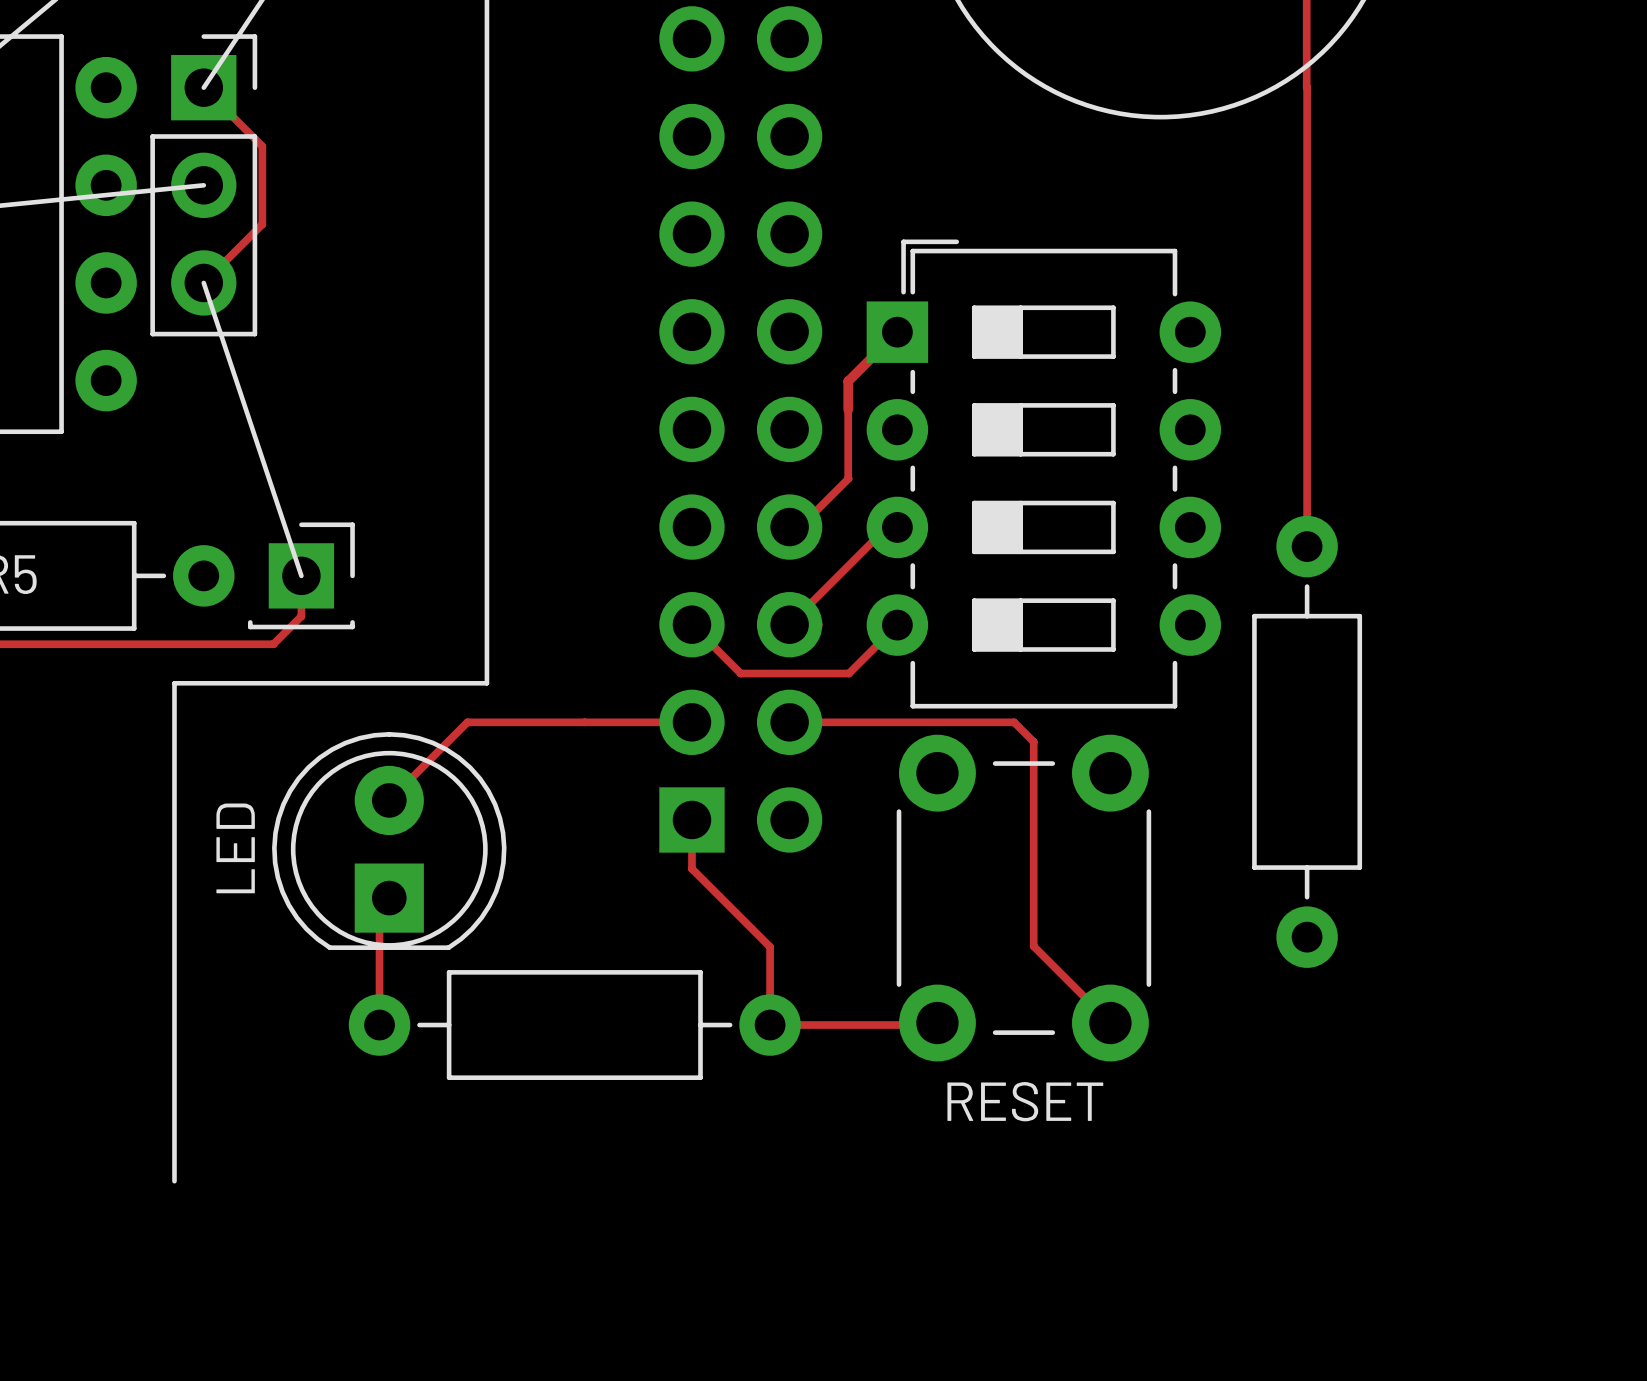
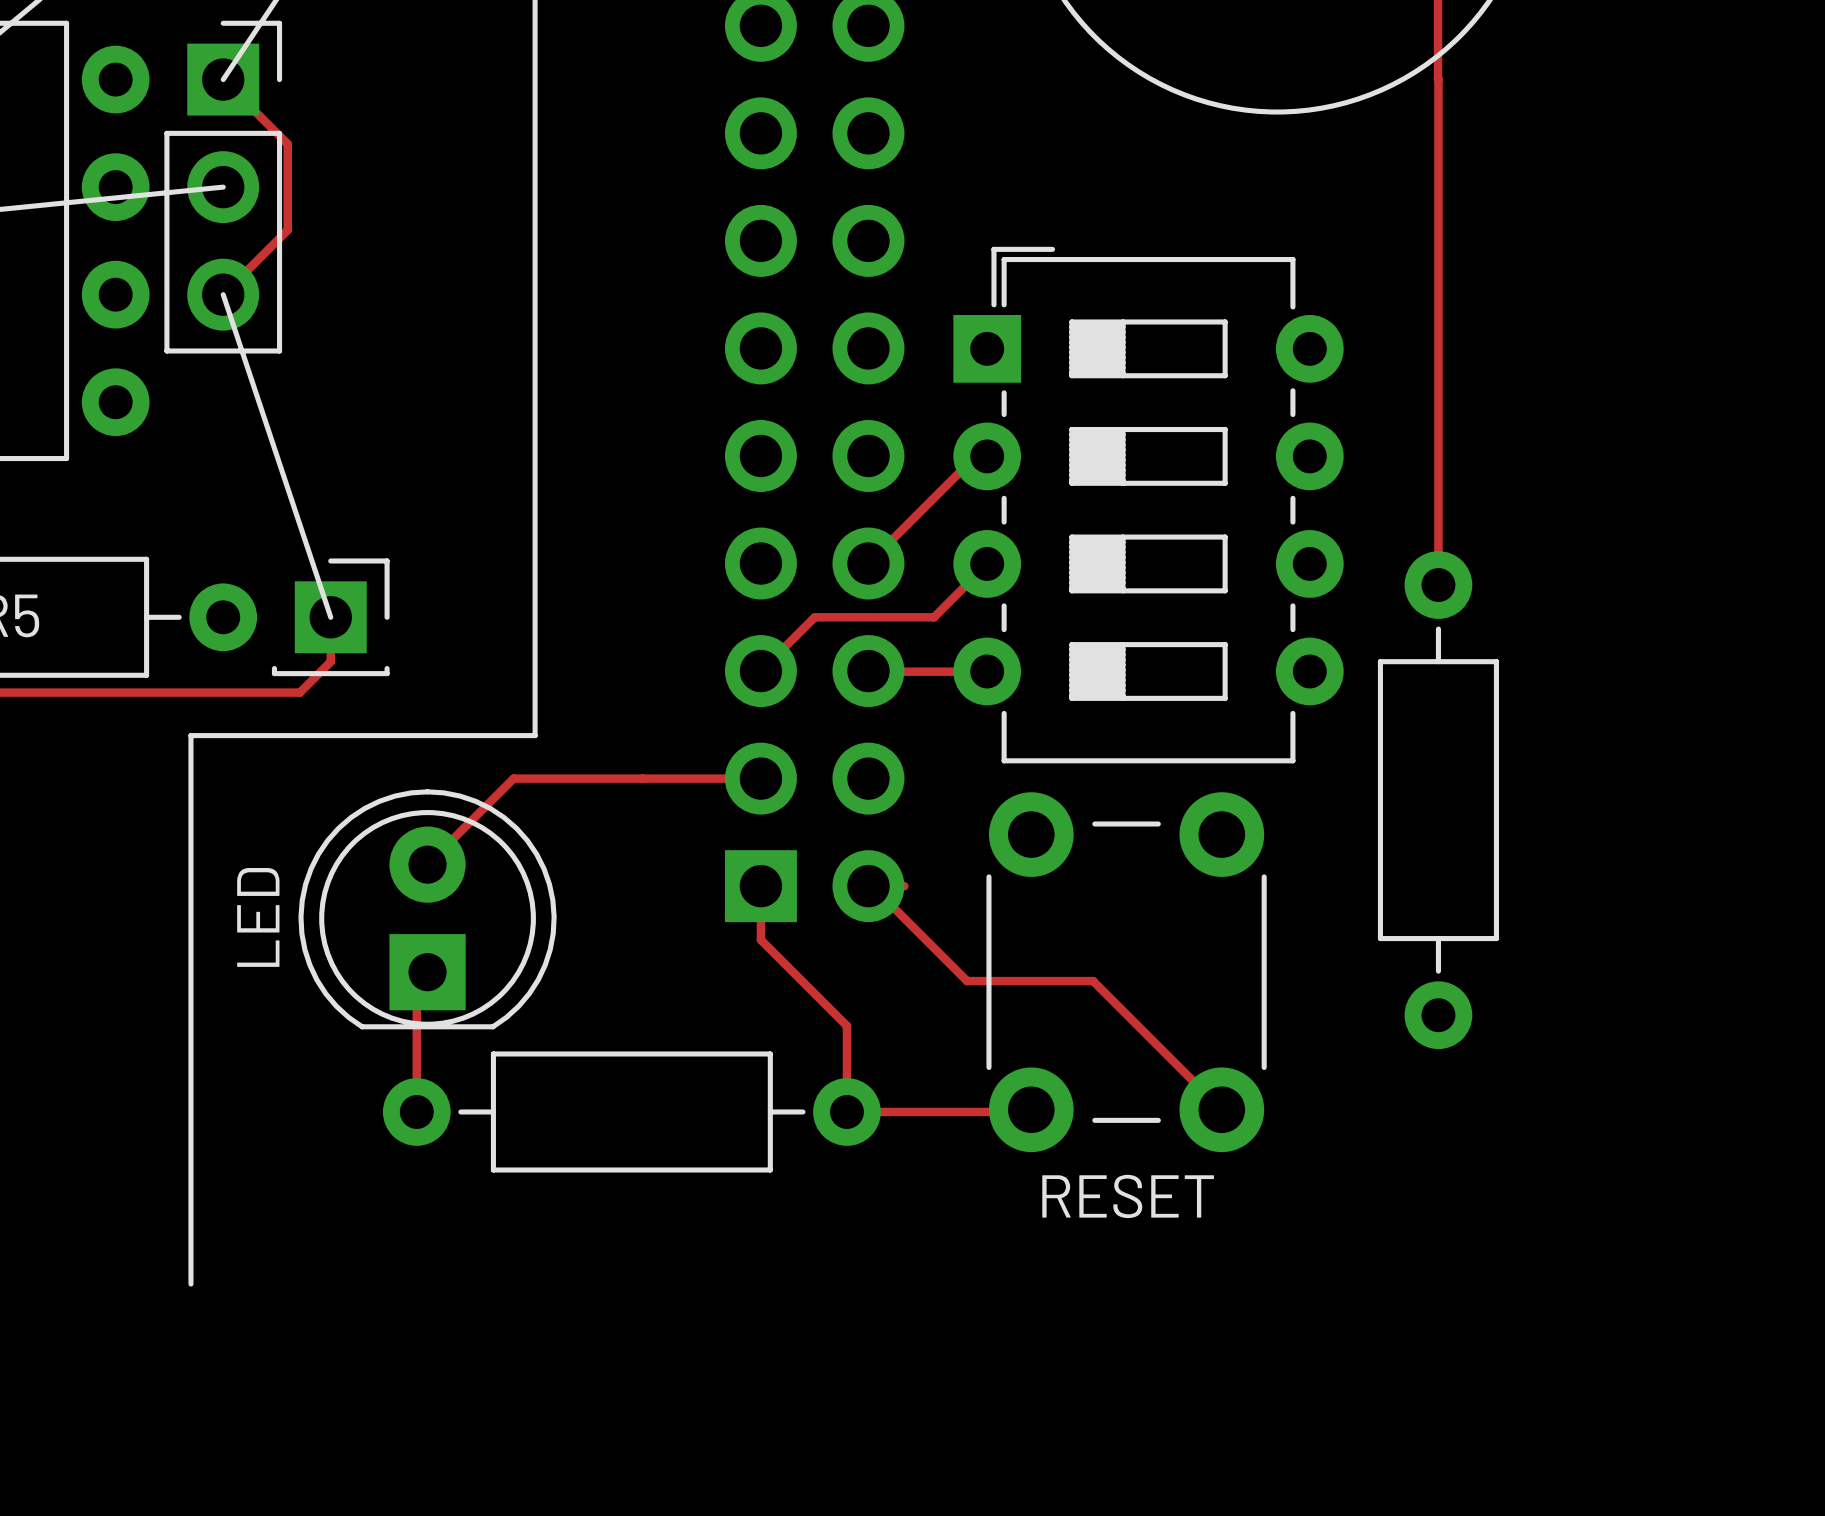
track: (897, 332) (848, 381) (848, 478) -> none
track: (848, 478) (800, 527) (789, 527) -> (975, 456) (868, 563)
track: (897, 527) (886, 527) (789, 624) -> (987, 671) (869, 671)
track: (691, 624) (740, 673) (848, 673) (897, 625) -> (760, 671) (814, 617) (934, 617) (987, 564)
track: (789, 722) (1014, 722) (1033, 741) (1033, 946) -> (904, 886) (872, 886) (967, 981) (1093, 981) (1137, 1025)

